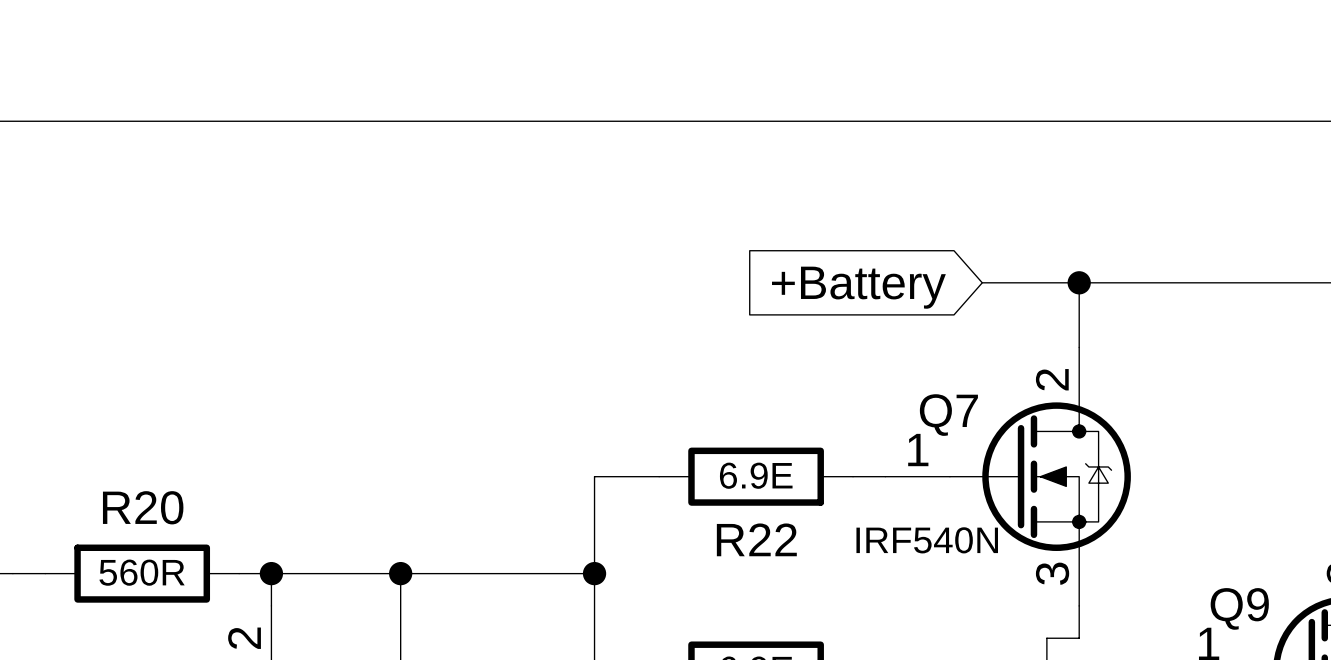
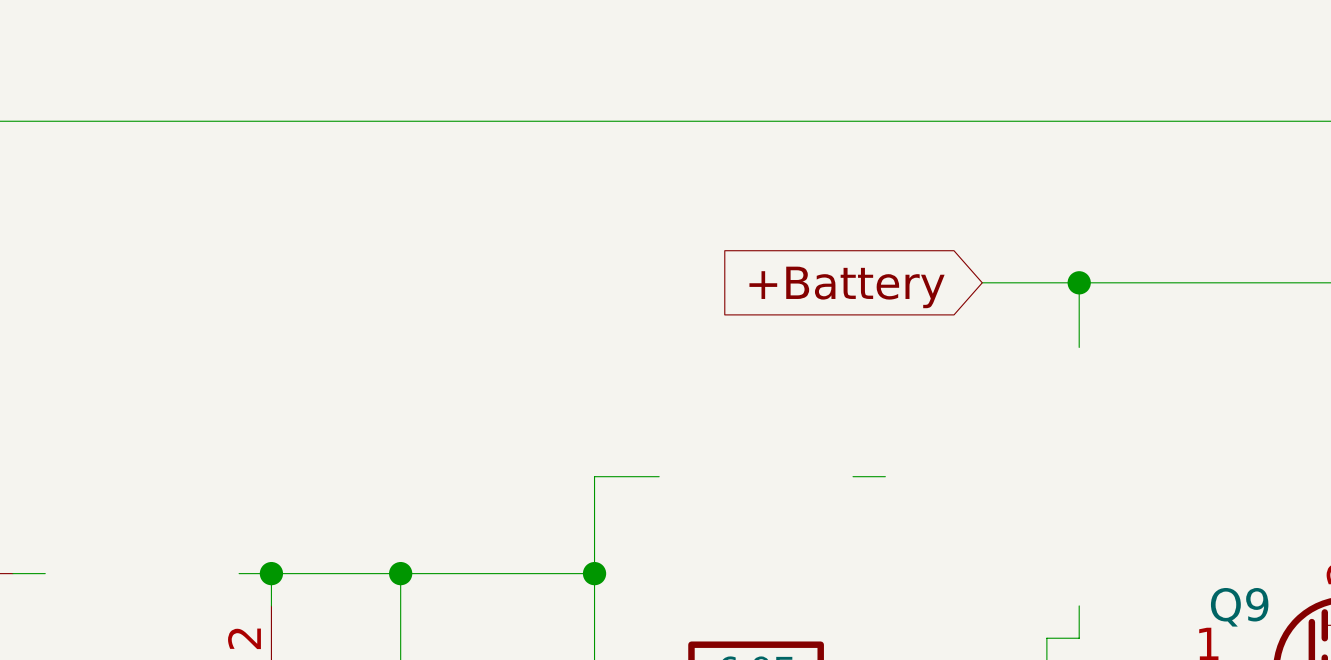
R22: 6.9E (756, 476) -> none
Q7: IRF540N (1008, 476) -> none
R20: 560R (142, 573) -> none

